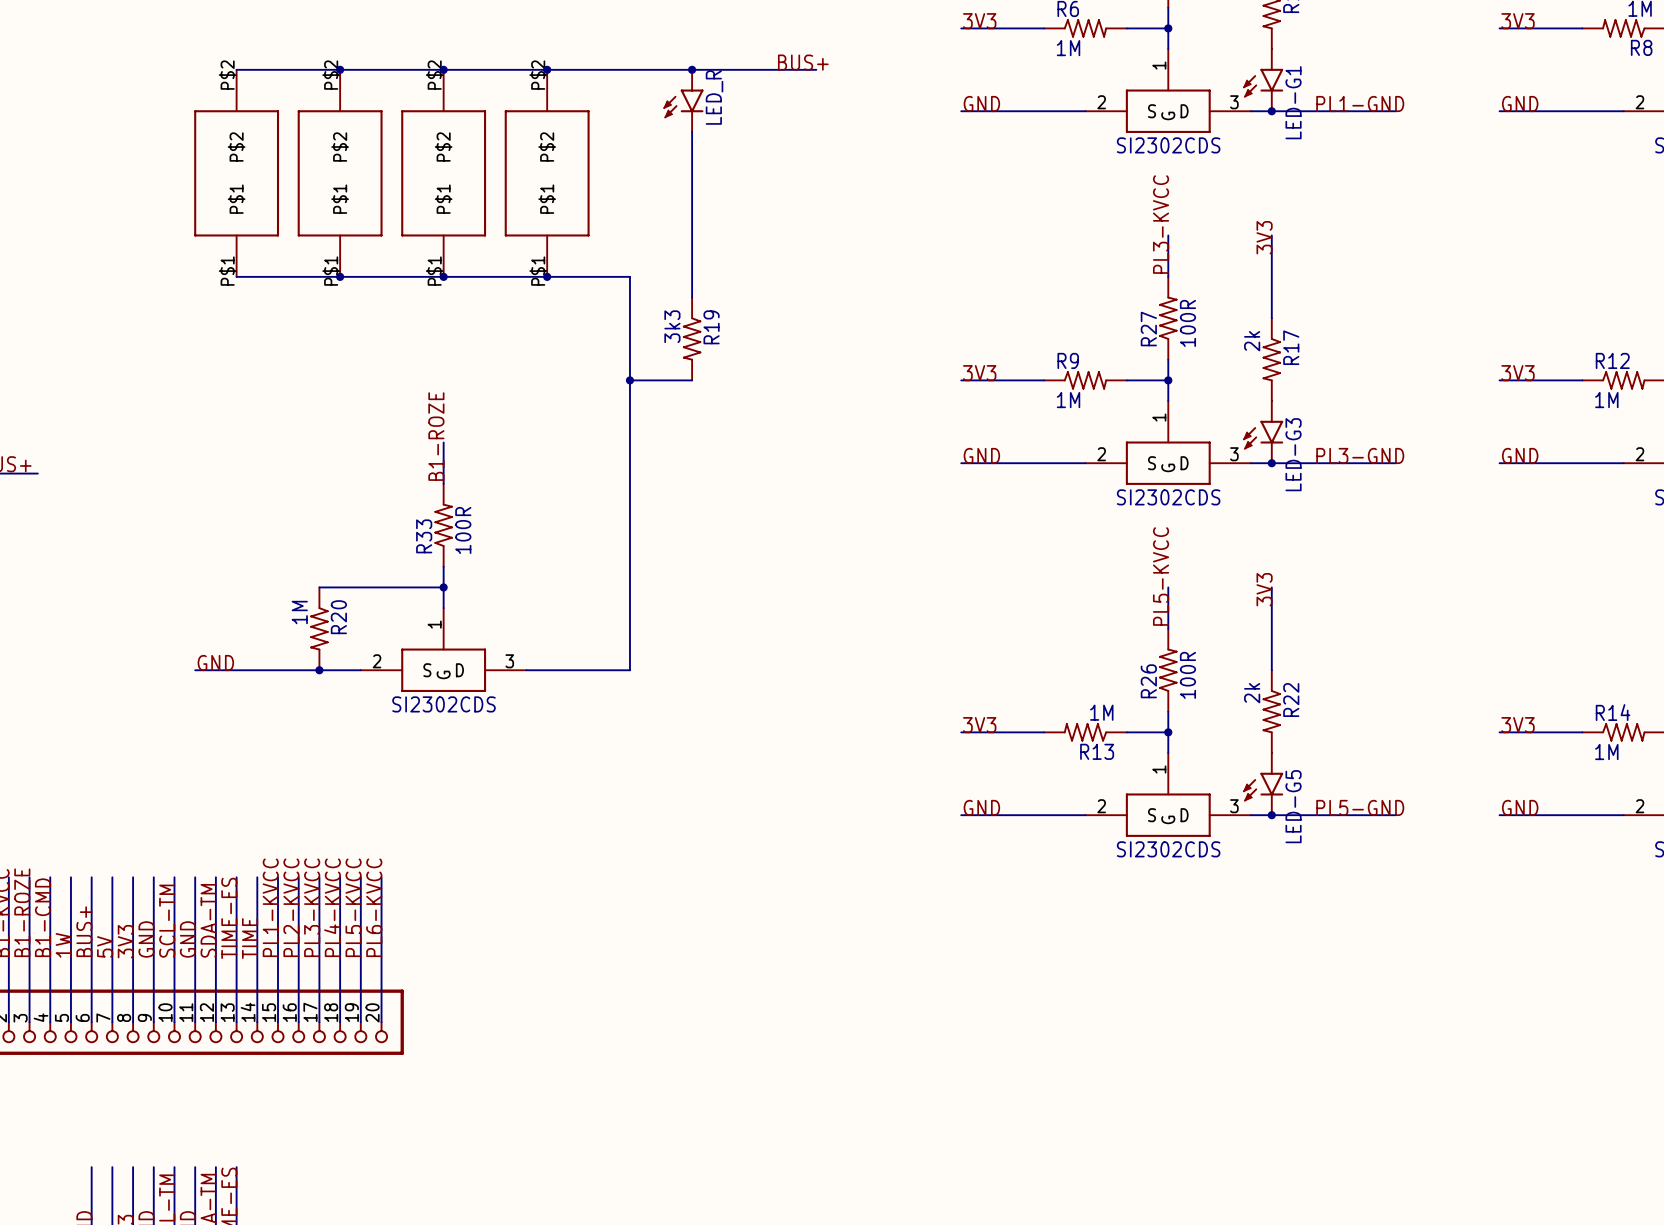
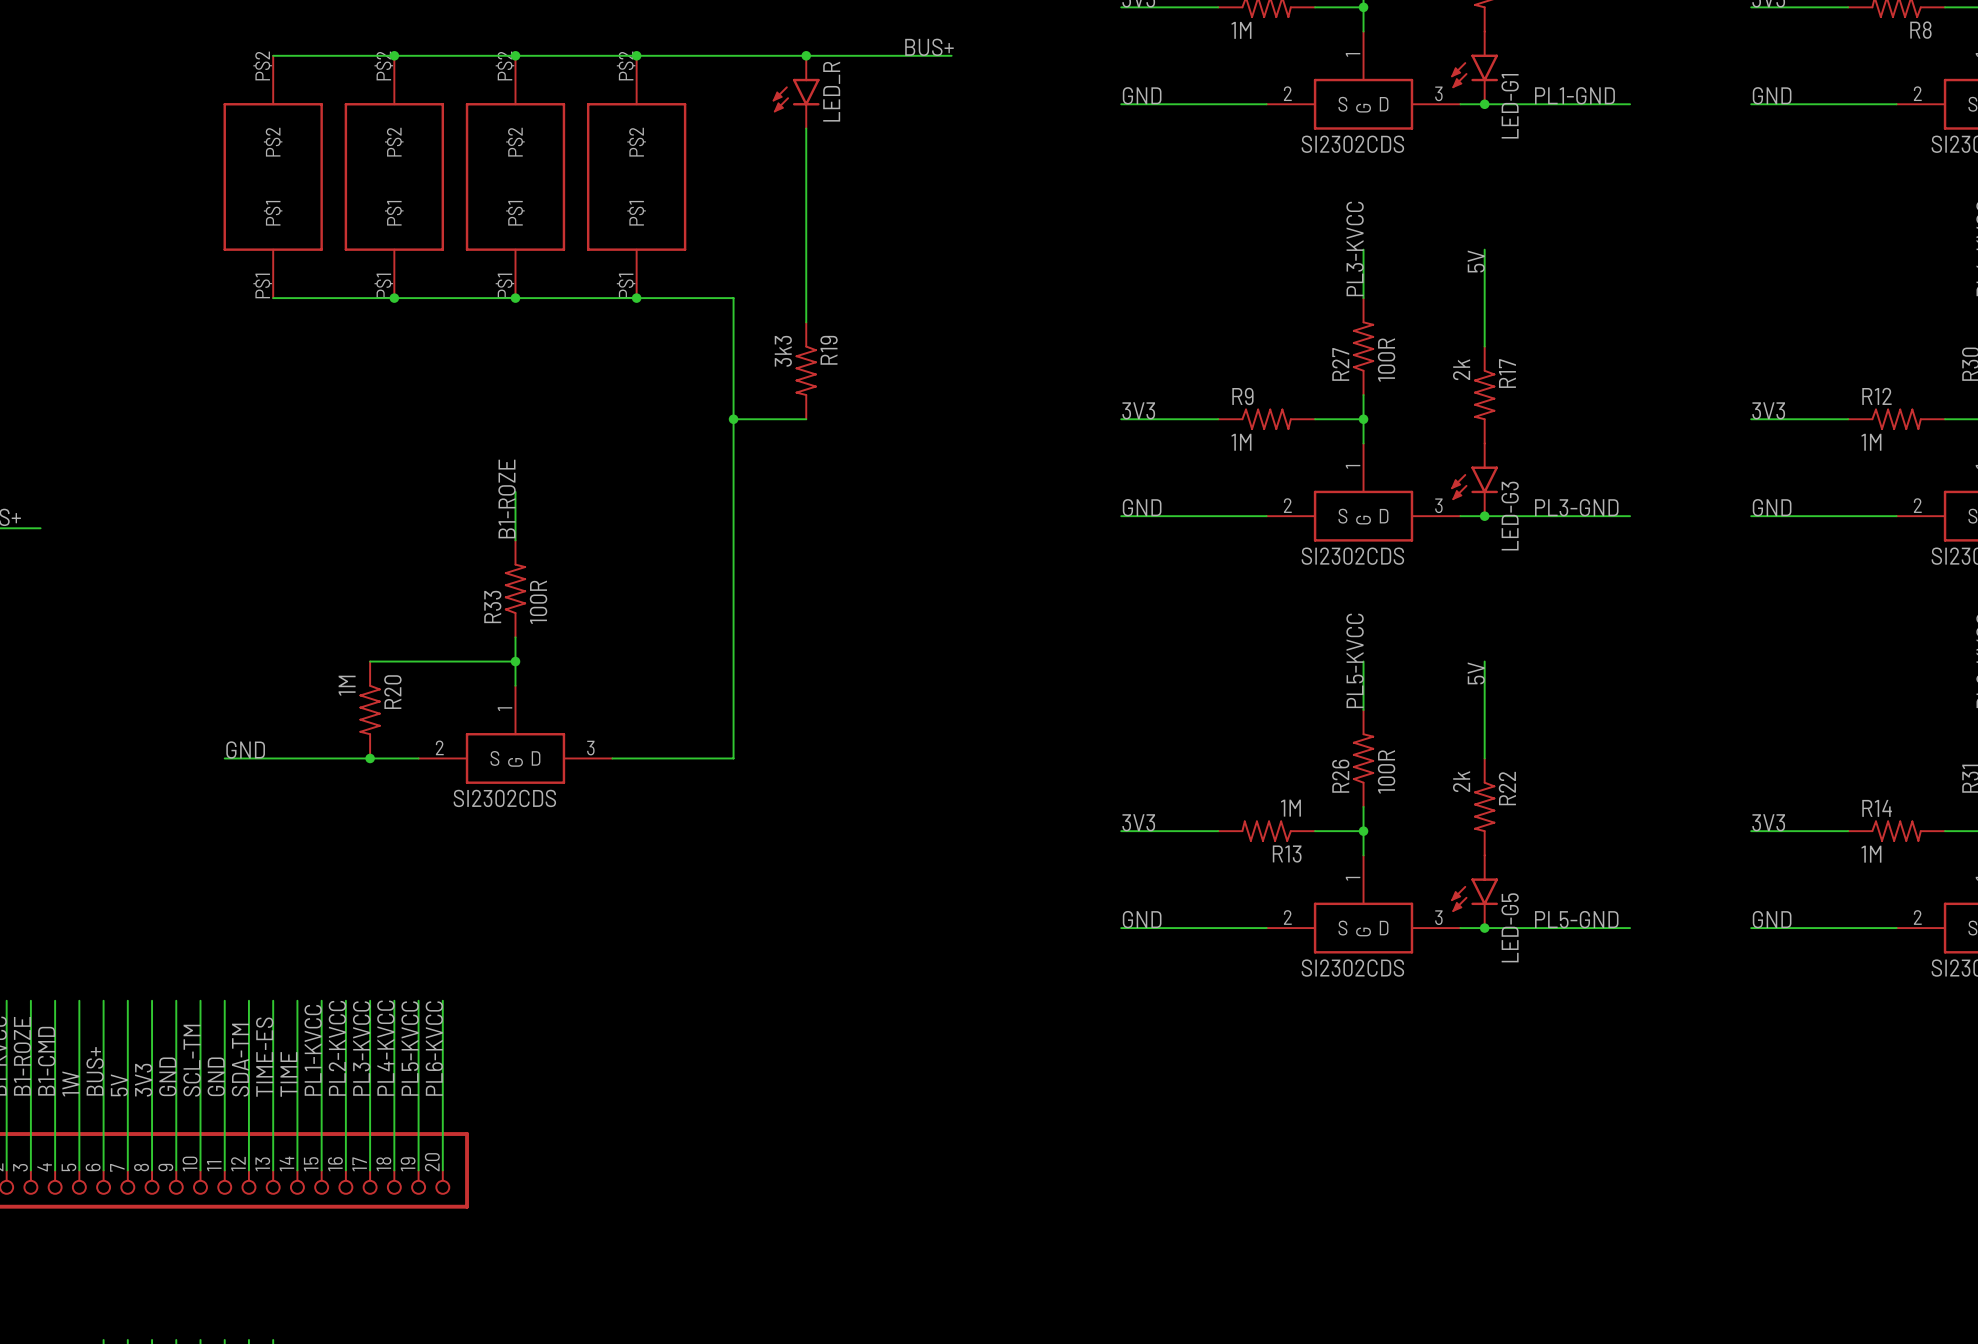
label: 3V3 (1264, 237) -> 5V (1476, 261)
label: 3V3 (1264, 589) -> 5V (1476, 673)

